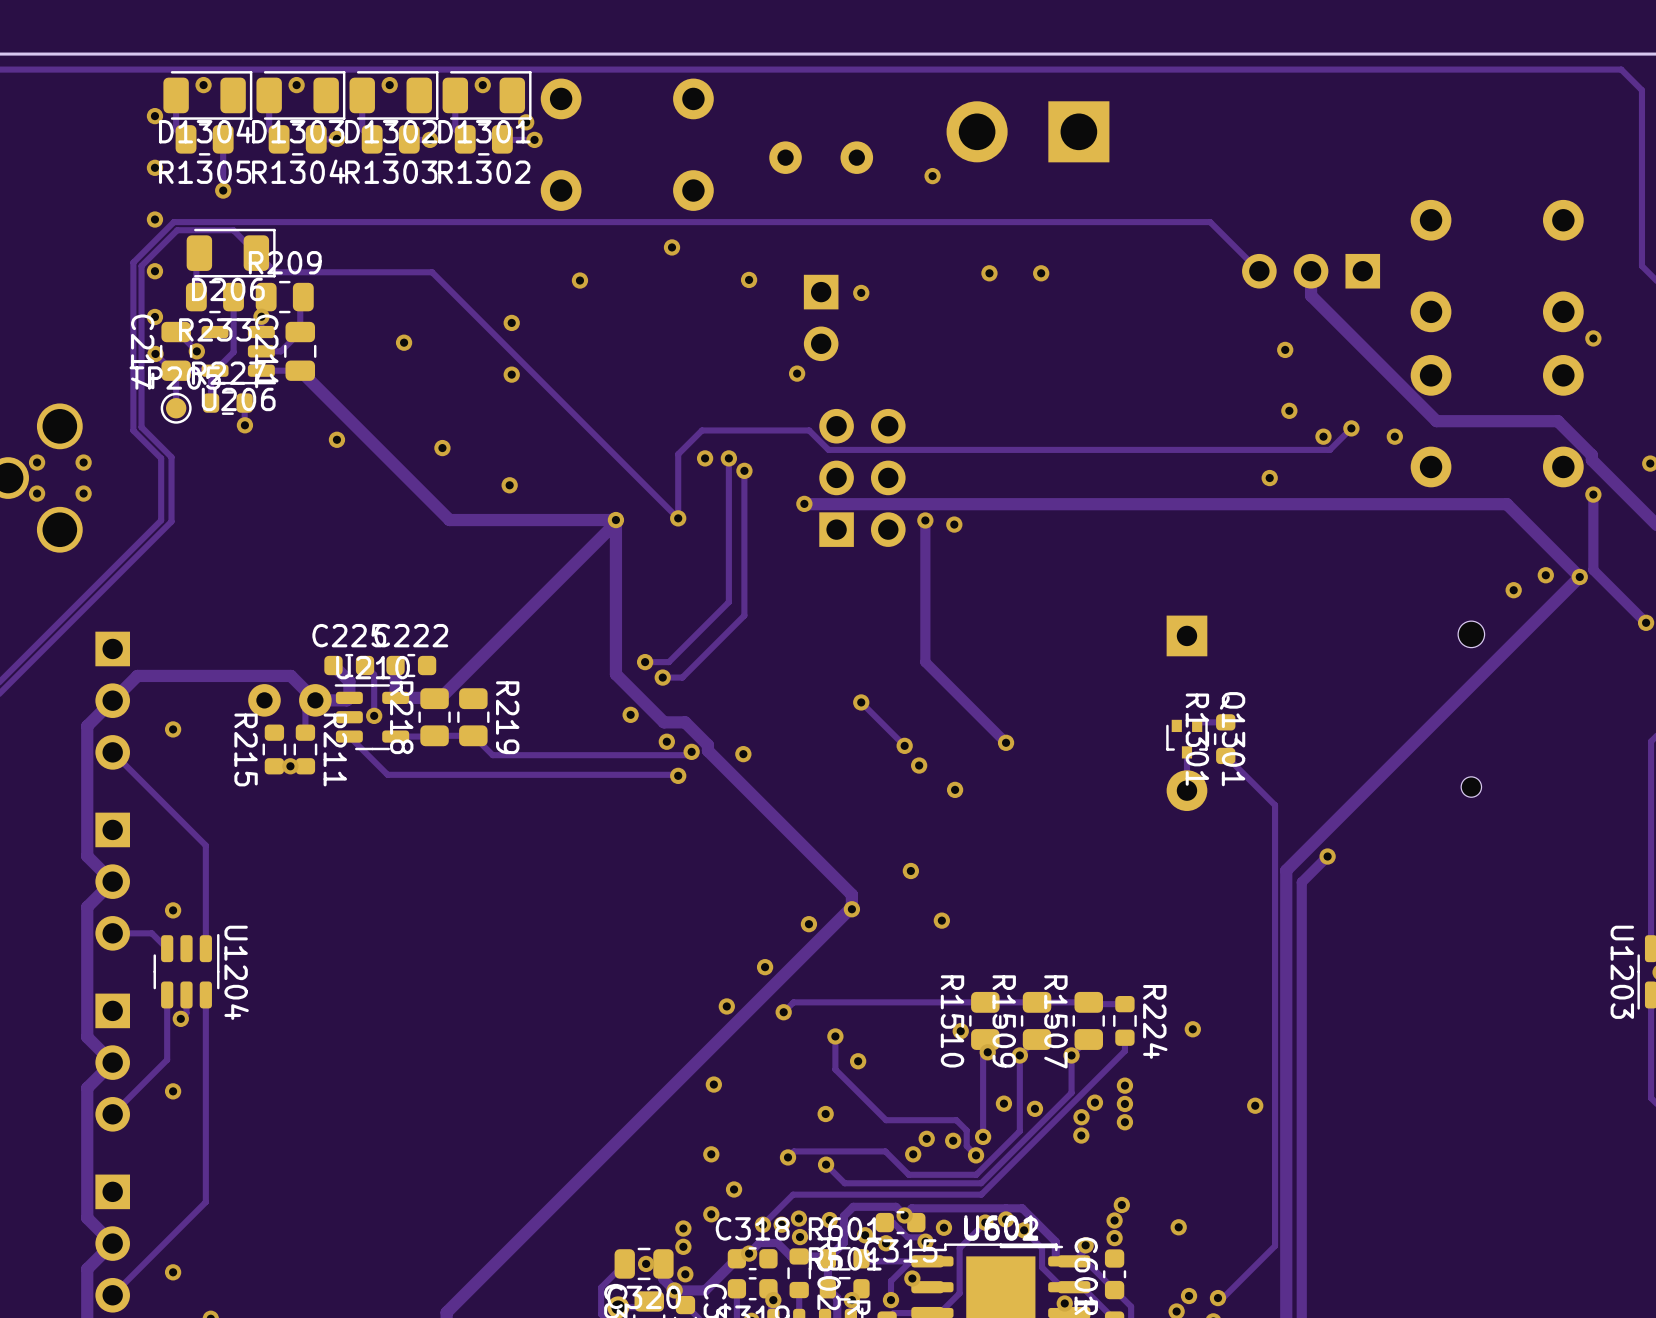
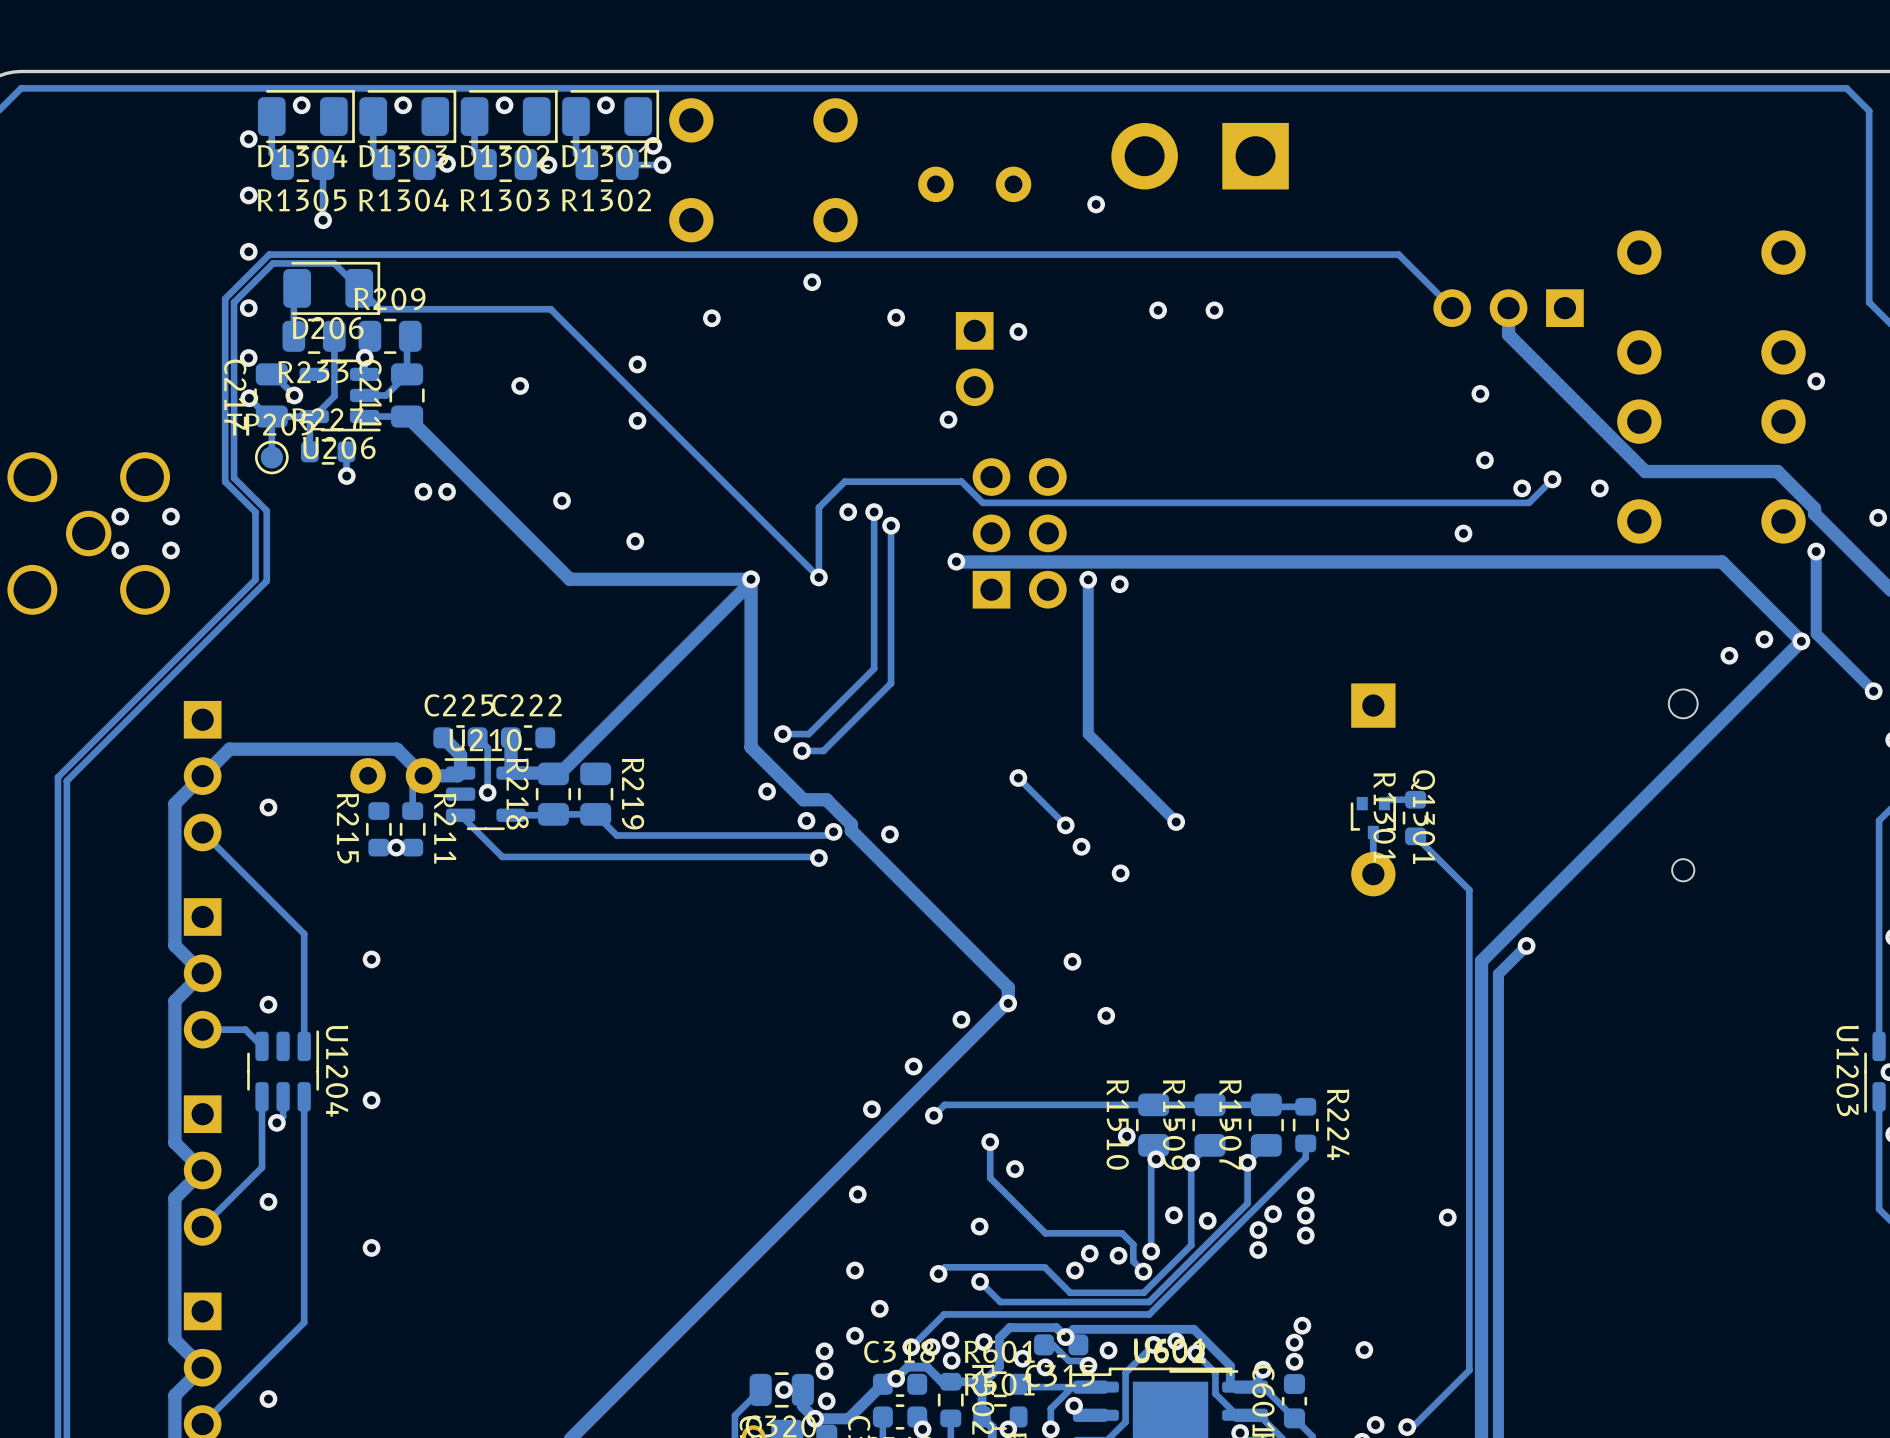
via: none -> (423, 491)
via: none -> (371, 959)
via: none -> (371, 1100)
via: (1192, 1029) -> none
via: none -> (371, 1247)

